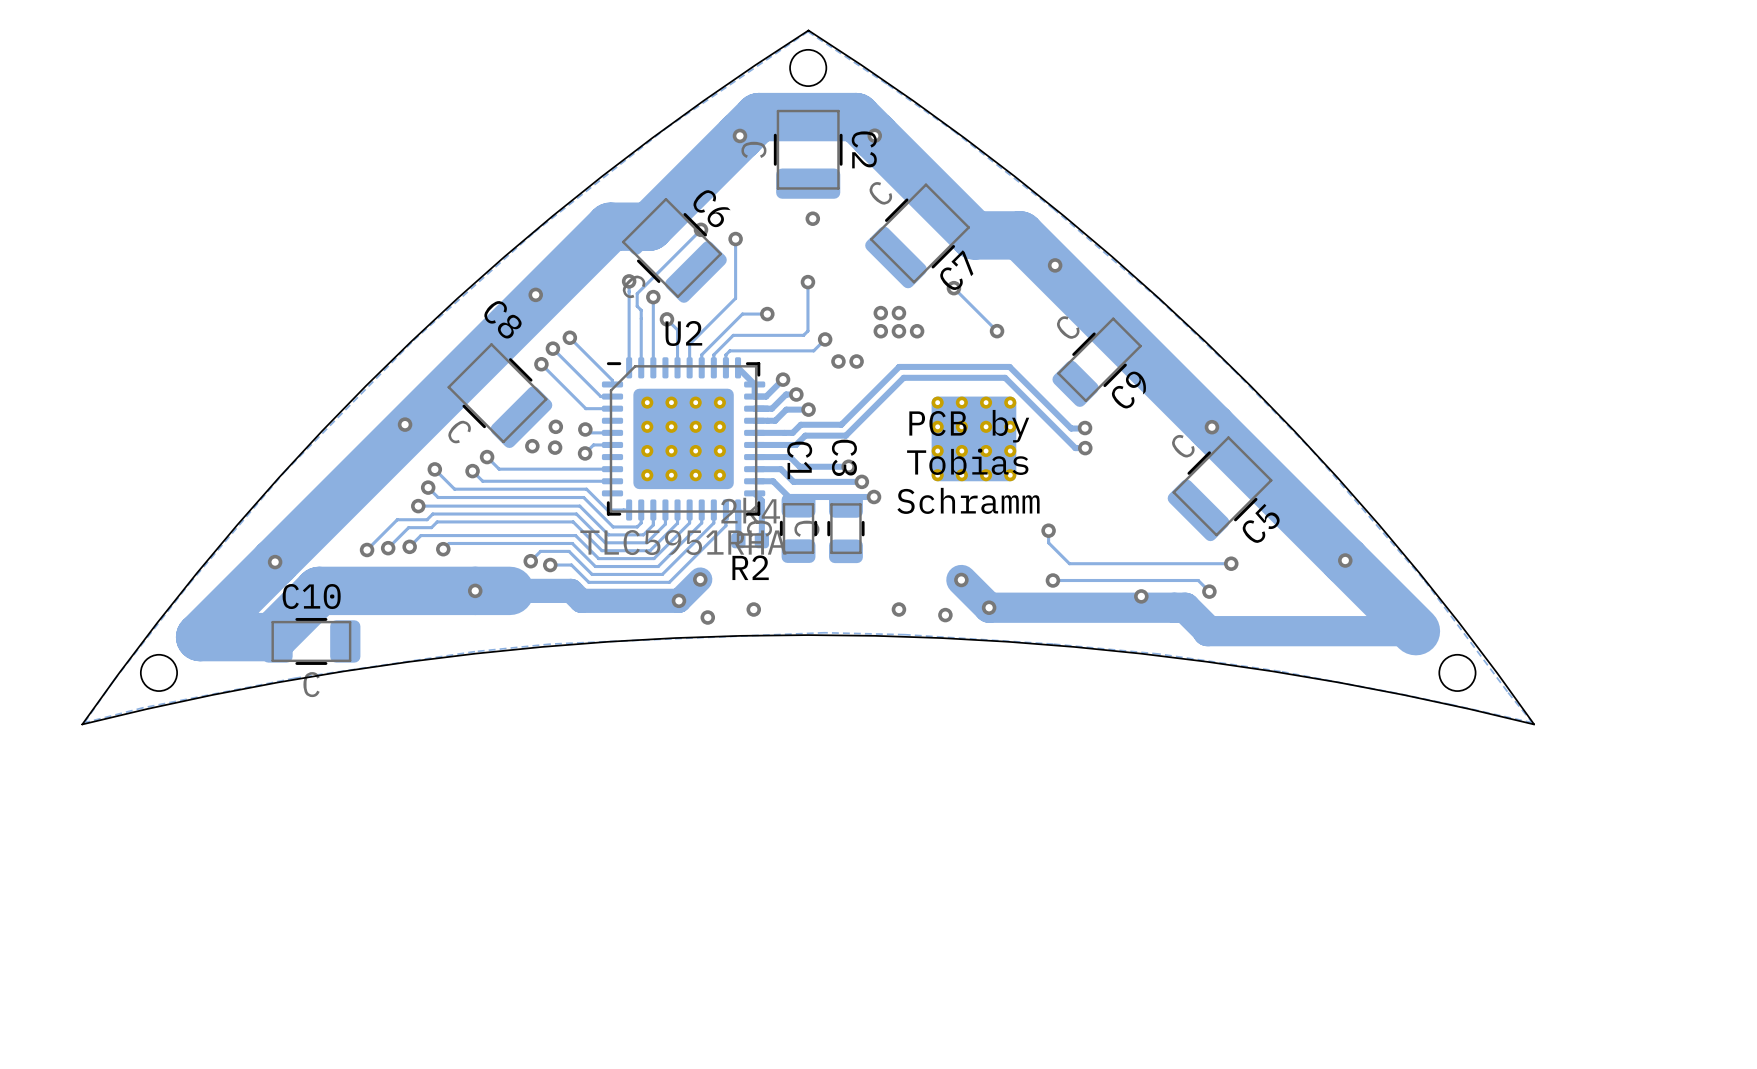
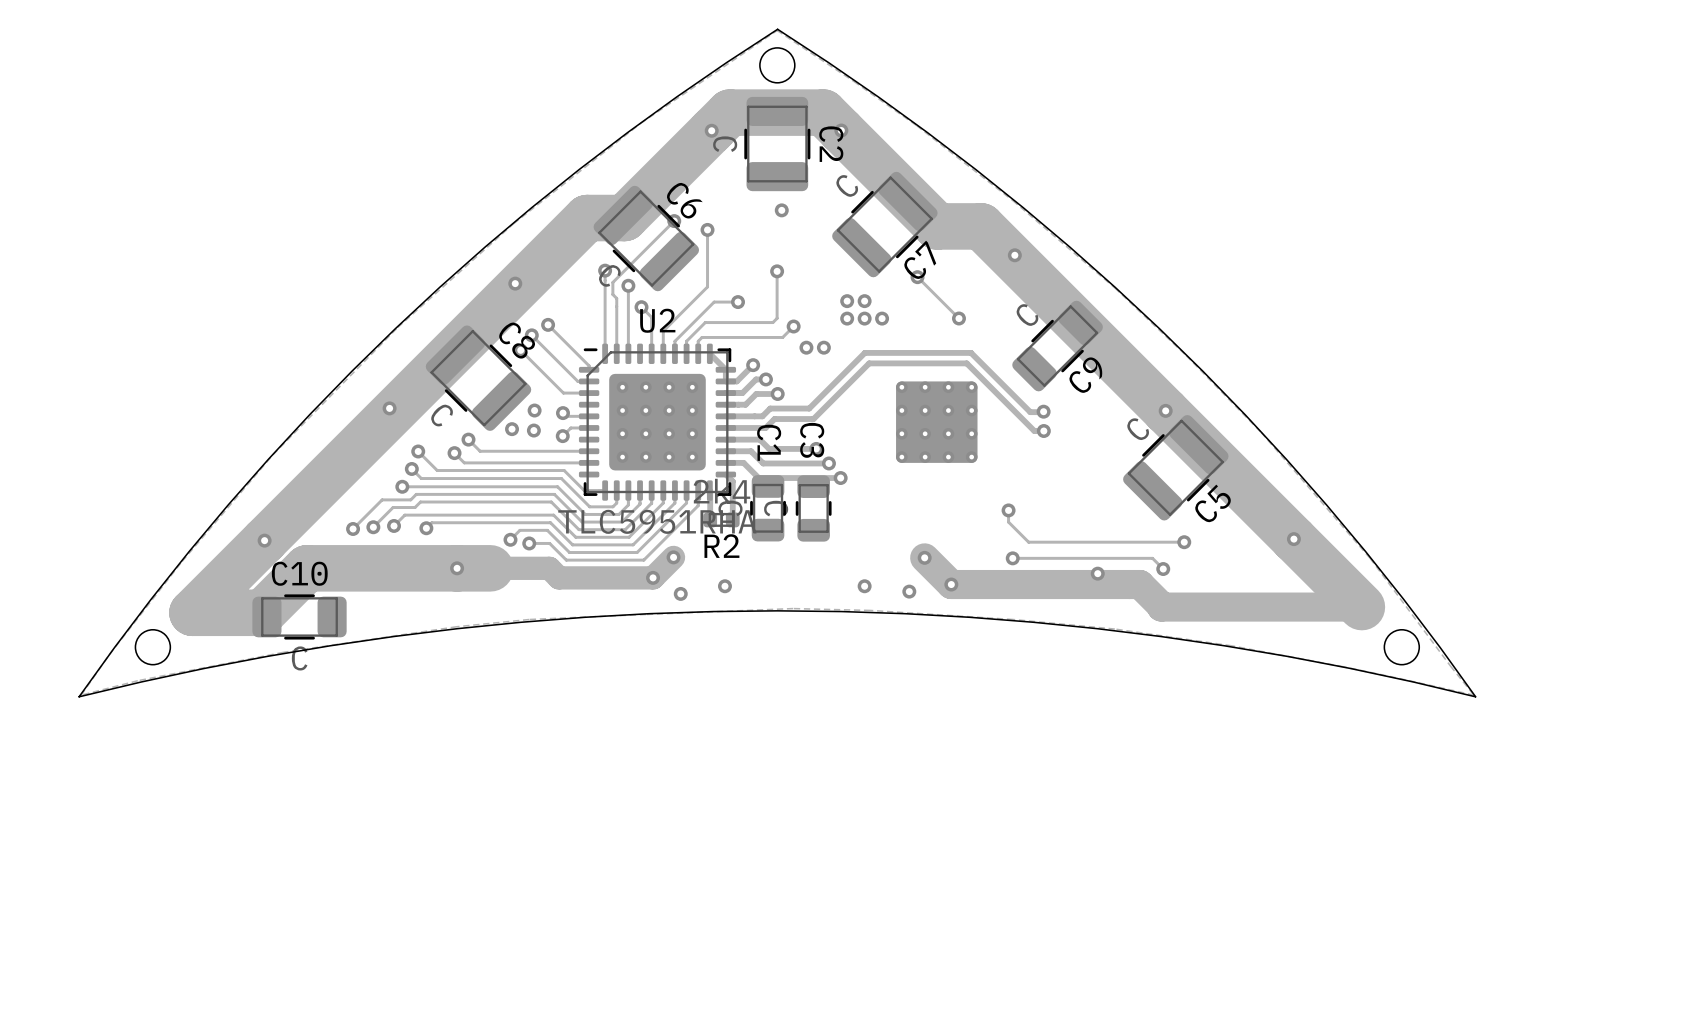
C8 name position: C8 (502, 319) -> C8 (516, 340)
text: PCB by (969, 426) -> none
text: Tobias (967, 461) -> none
text: Schramm (968, 500) -> none

